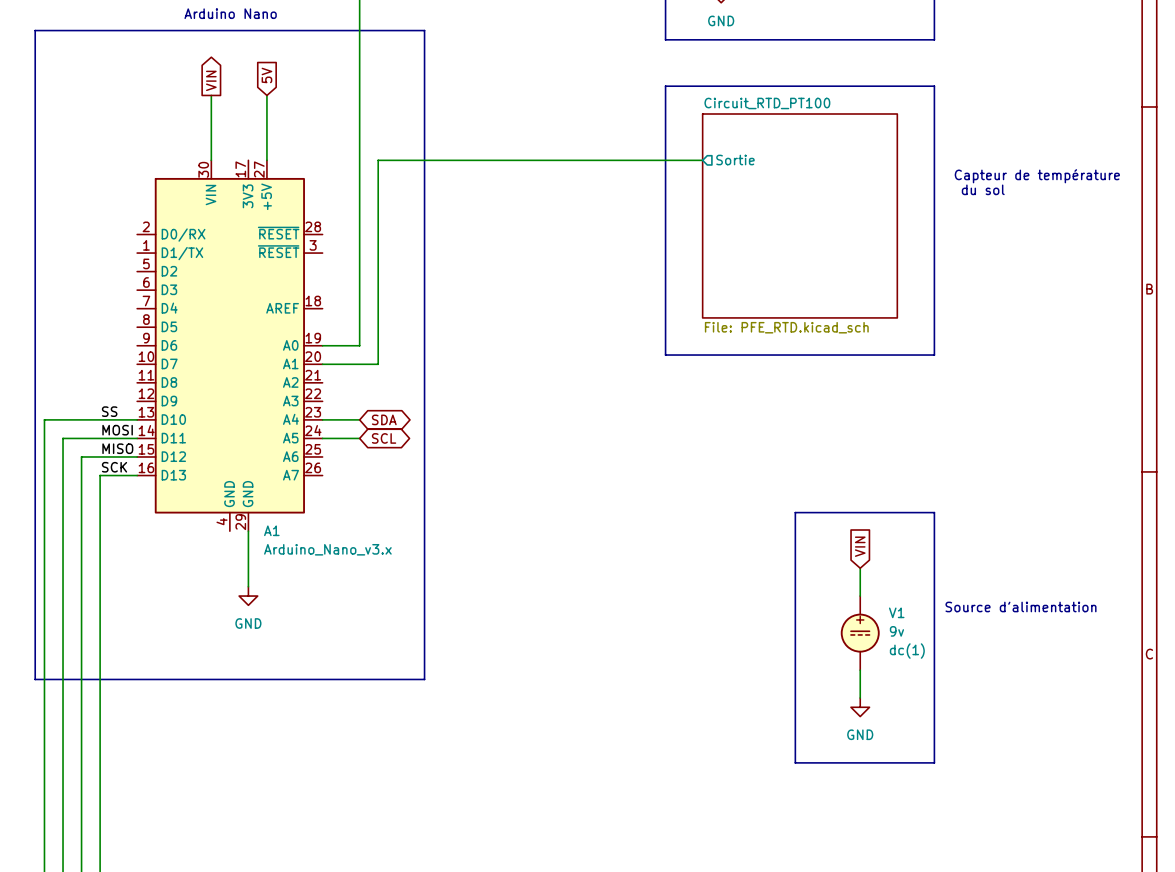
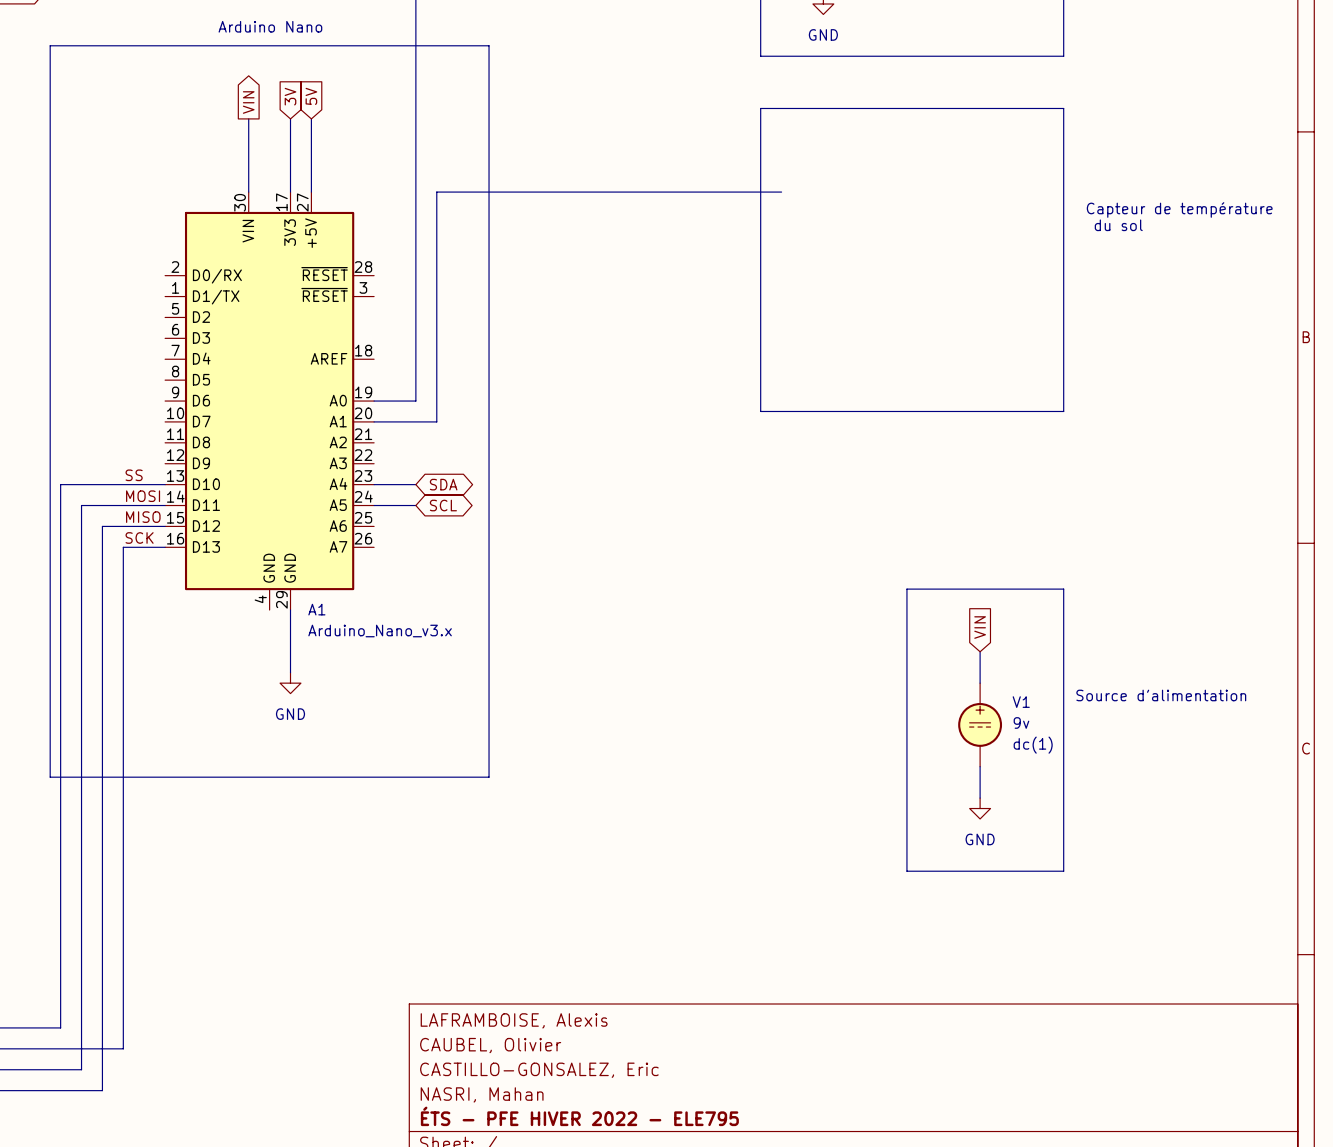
global label: none -> 3V (290, 96)
wire: none -> (290, 118) (290, 192)
wire: (684, 160) (702, 160) -> none
sheet pin: Sortie (735, 160) -> none
sheet Circuit_RTD_PT100: File: PFE_RTD.kicad_sch (799, 215) -> none

